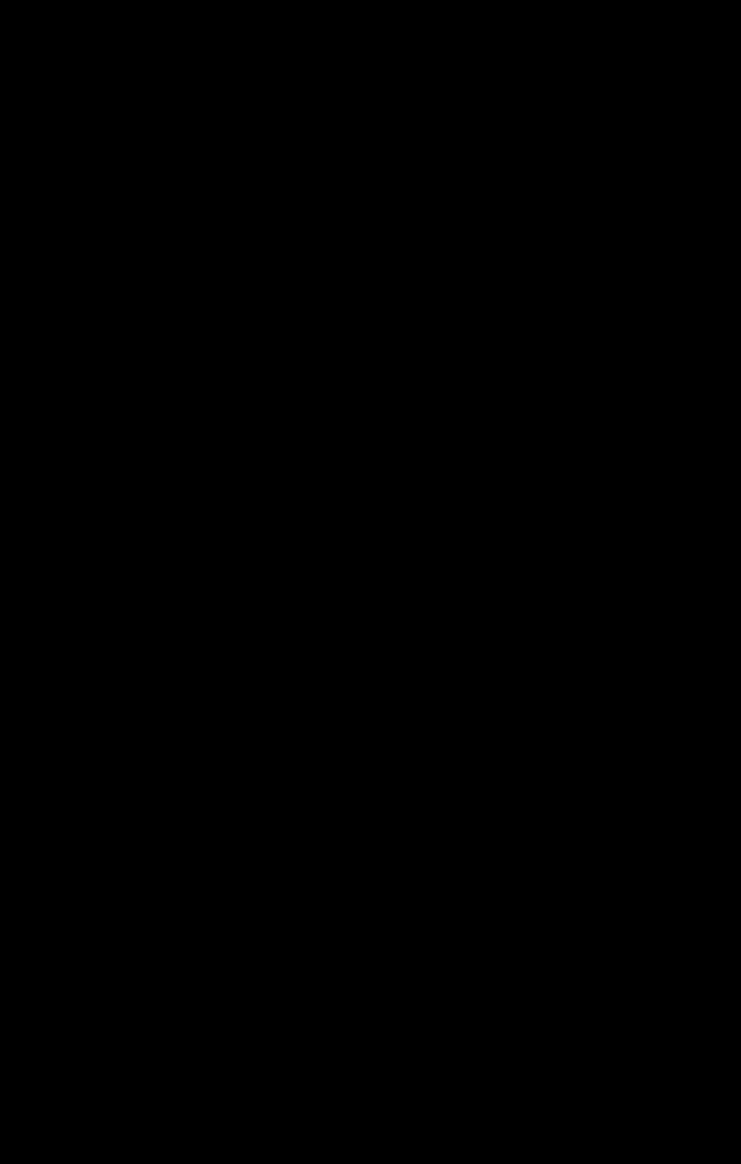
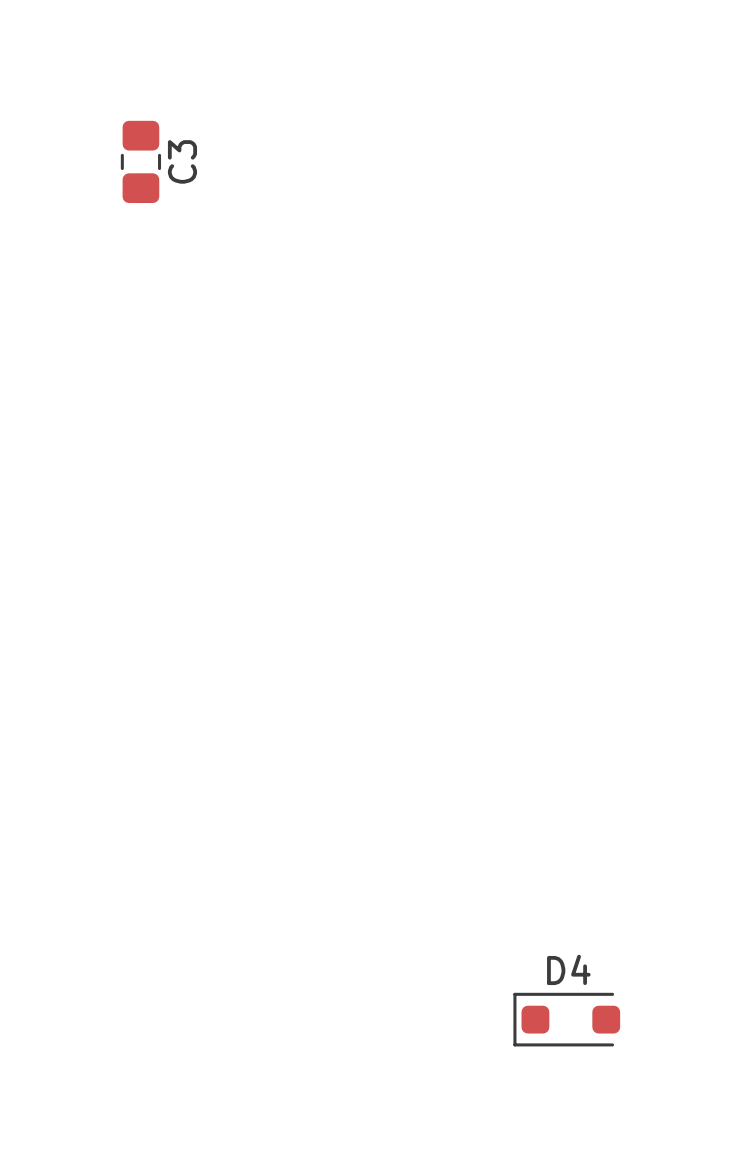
C3: none -> (140, 161)
D4: none -> (566, 1019)

